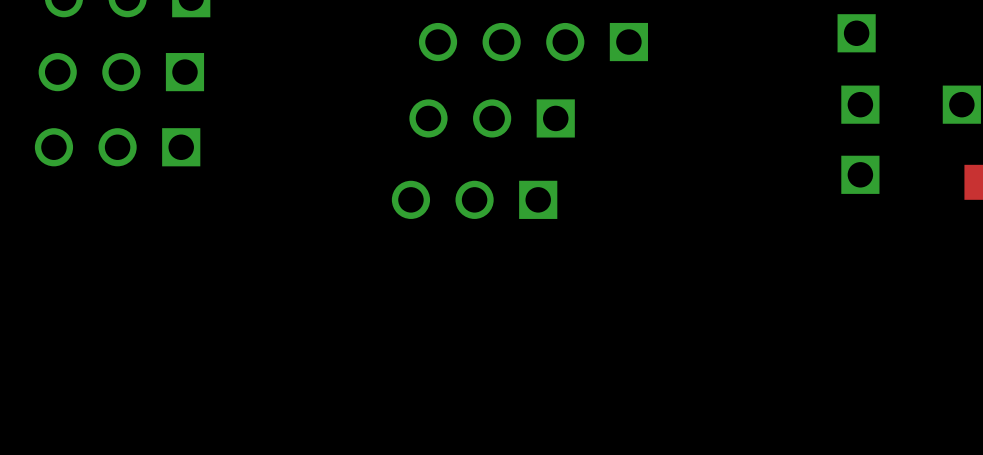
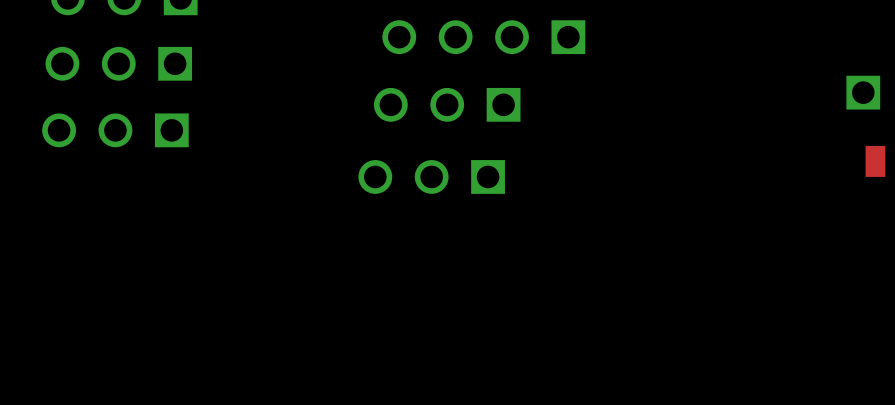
part: (856, 33) -> none
part: (860, 104) -> none
part: (860, 174) -> none

